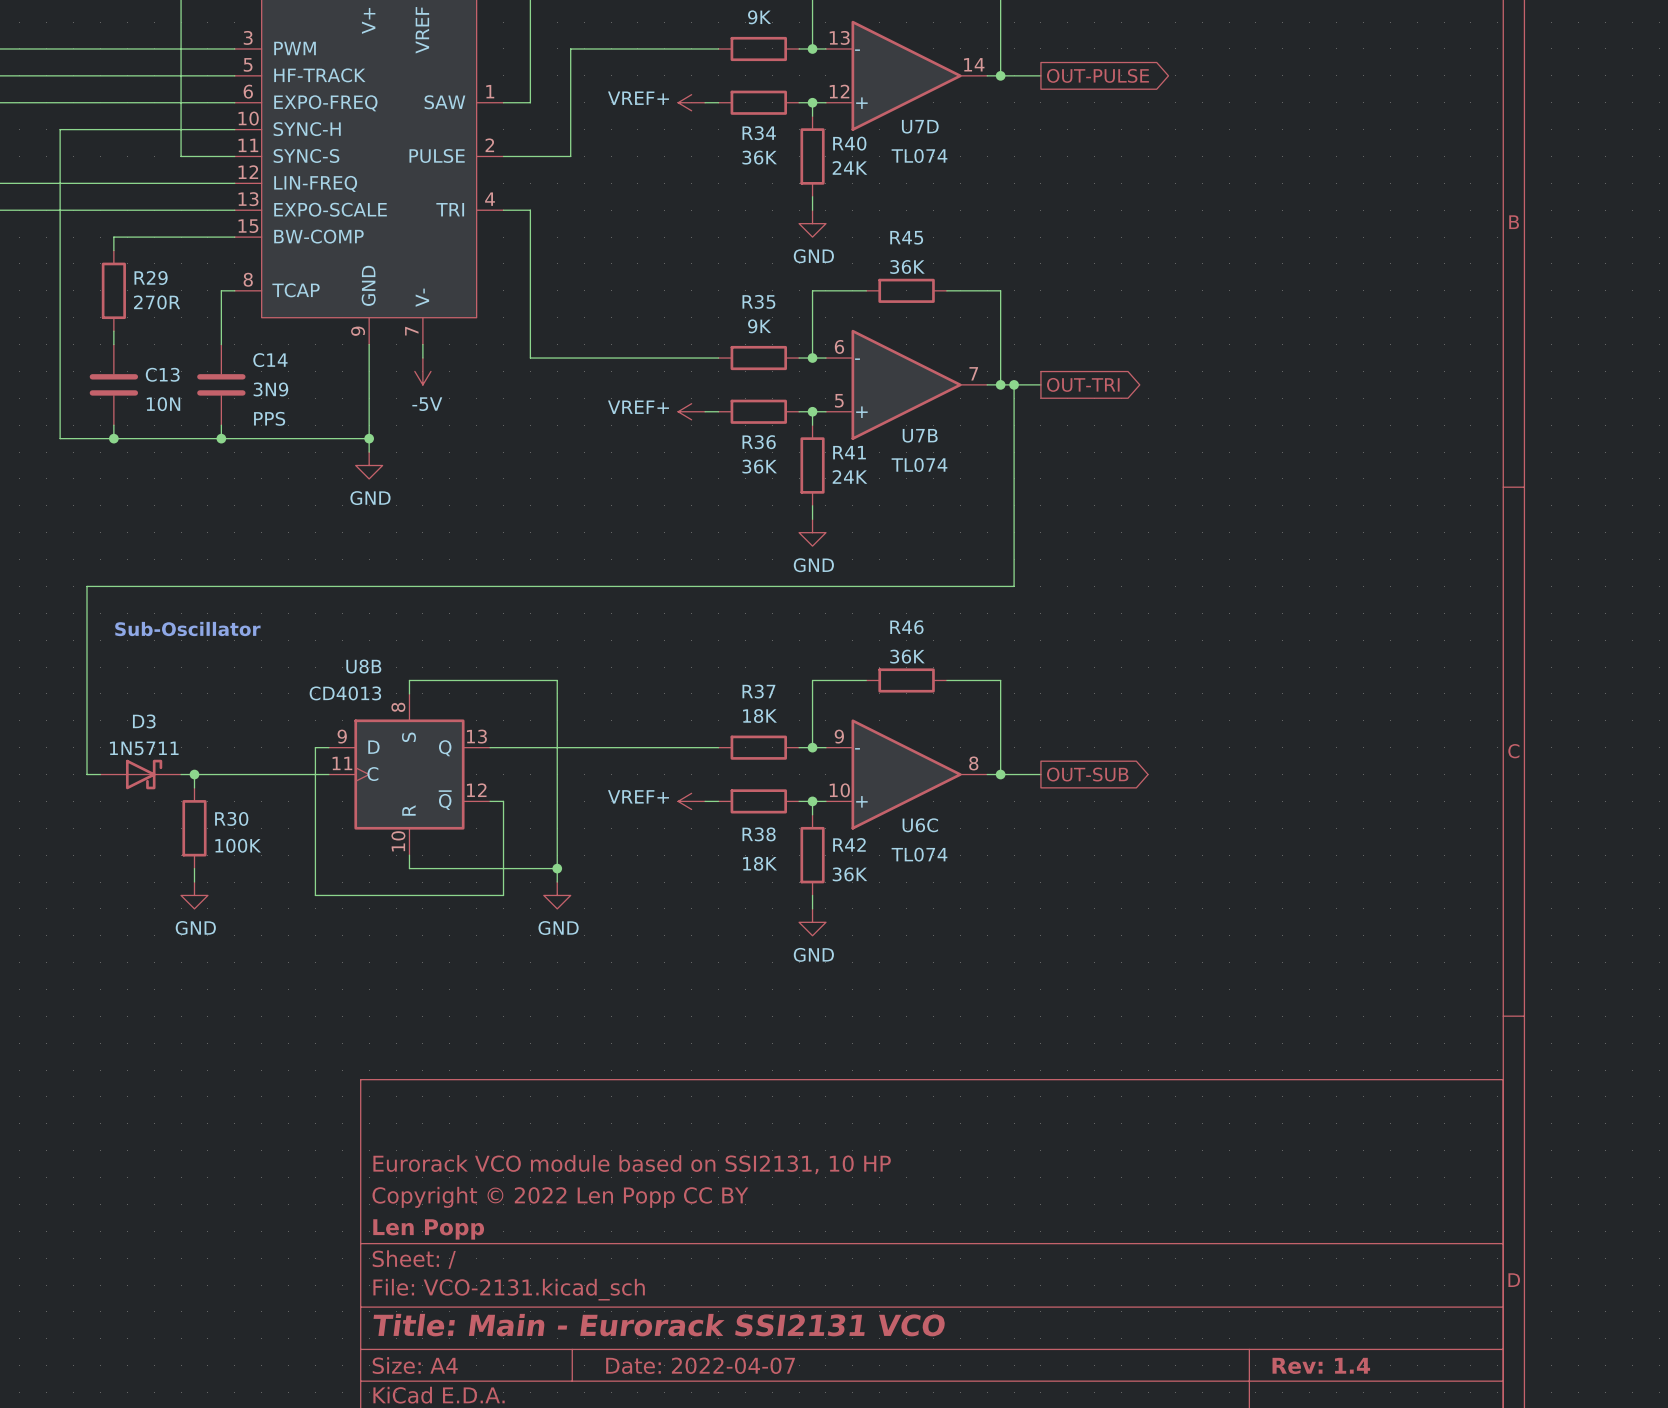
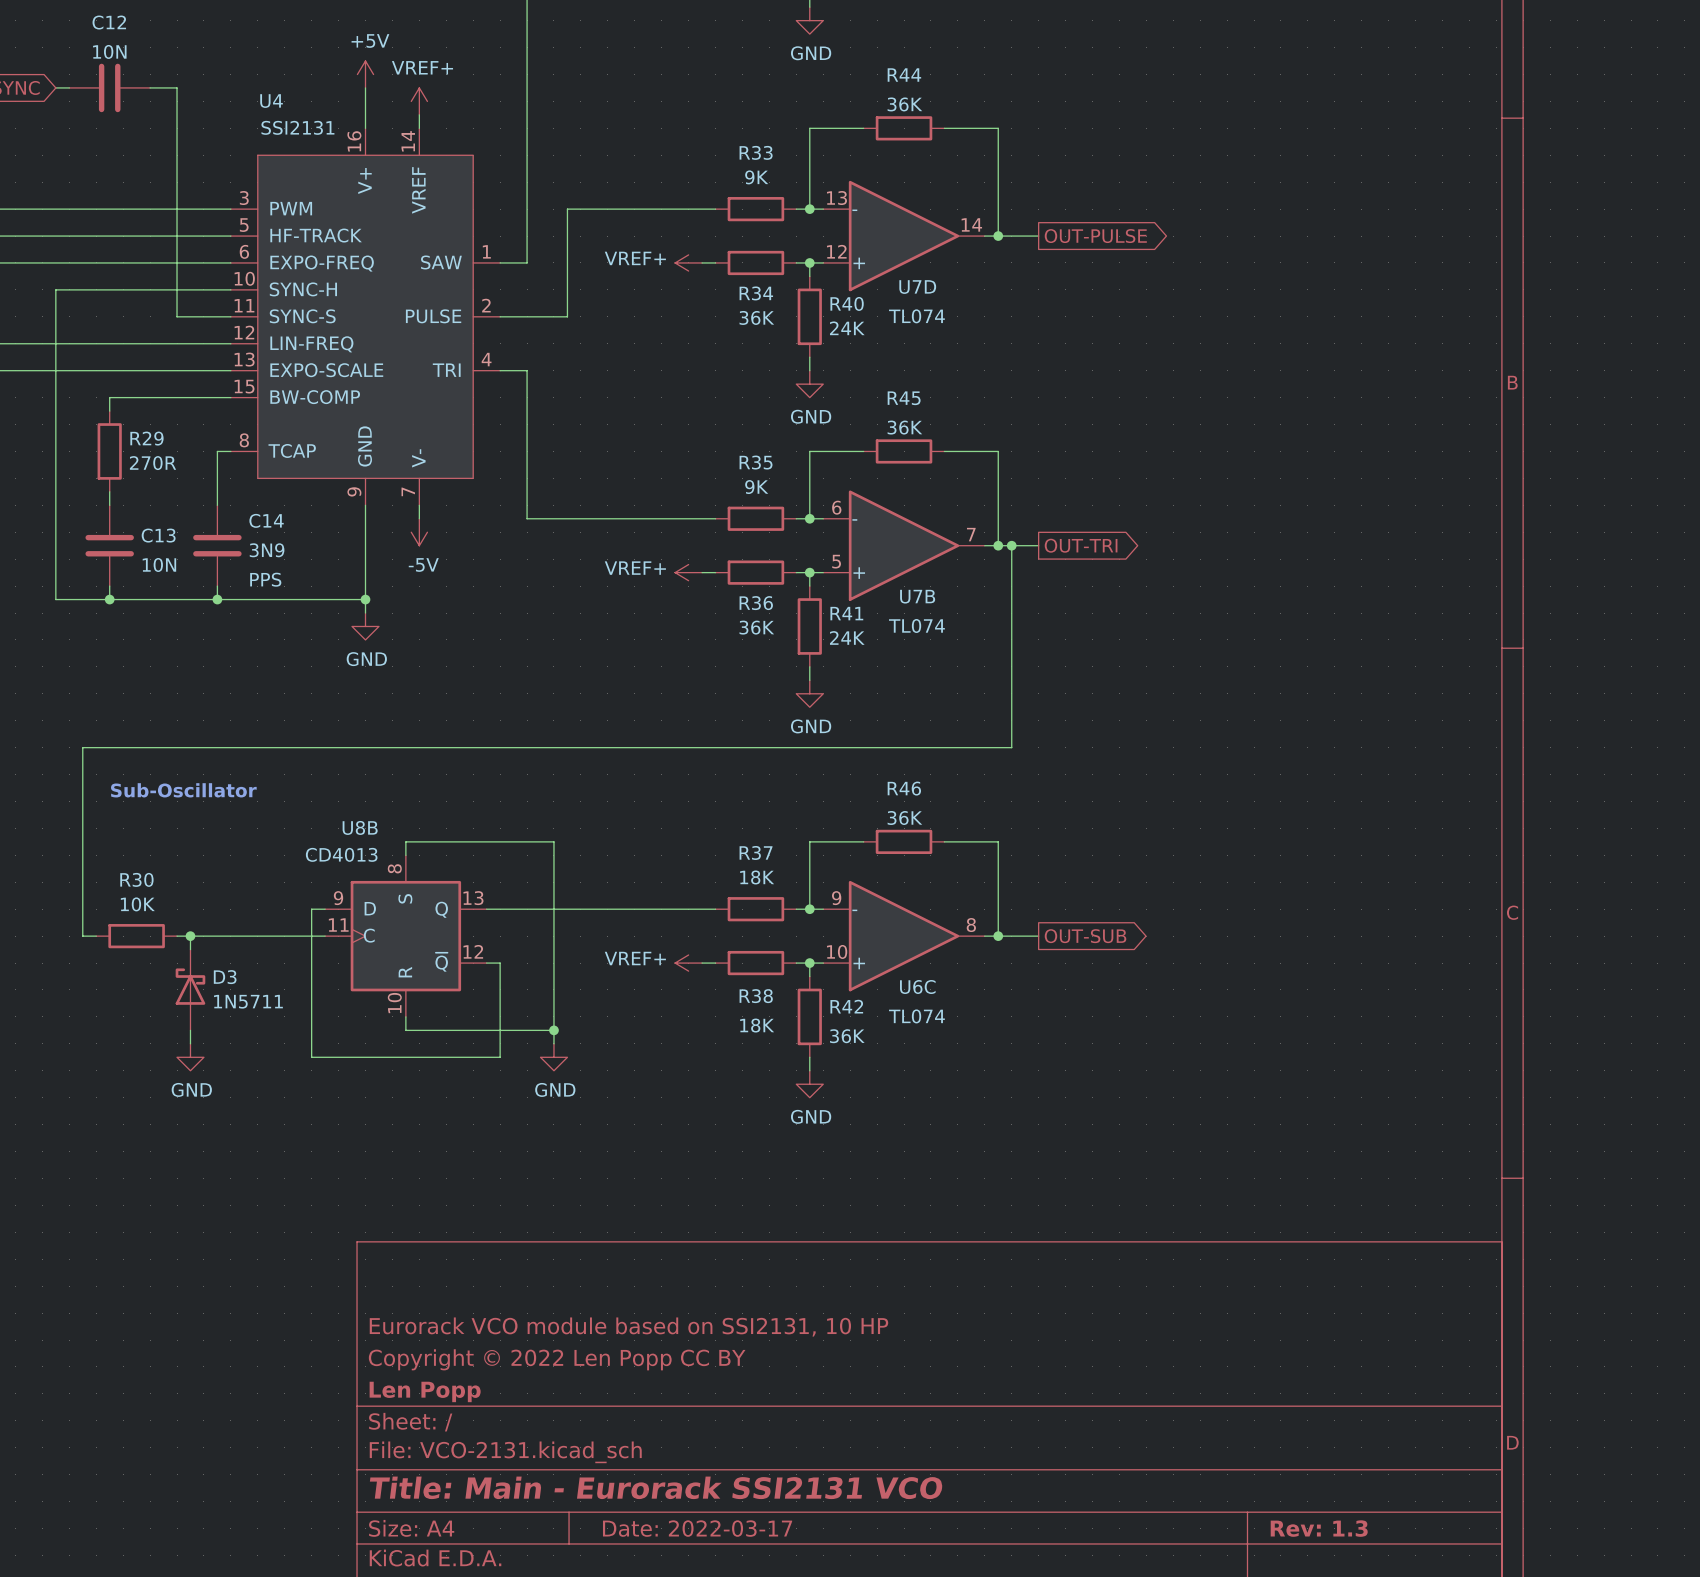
D3 name position: D3 (144, 721) -> D3 (225, 977)
D3 value position: 1N5711 (144, 748) -> 1N5711 (248, 1001)
D3 position: (140, 774) -> (190, 989)
D3 rotation: 0° (144, 774) -> 90° counterclockwise (190, 986)
R30 name position: R30 (231, 818) -> R30 (136, 879)
R30 rotation: 0° (194, 828) -> 90° clockwise (136, 936)
R30 position: (194, 828) -> (136, 936)
R30 value: 100K (238, 845) -> 10K (137, 904)
title block: Date: 2022-04-07 (700, 1365) -> Date: 2022-03-17 (697, 1528)
title block: Rev: 1.4 (1321, 1365) -> Rev: 1.3 (1319, 1528)

